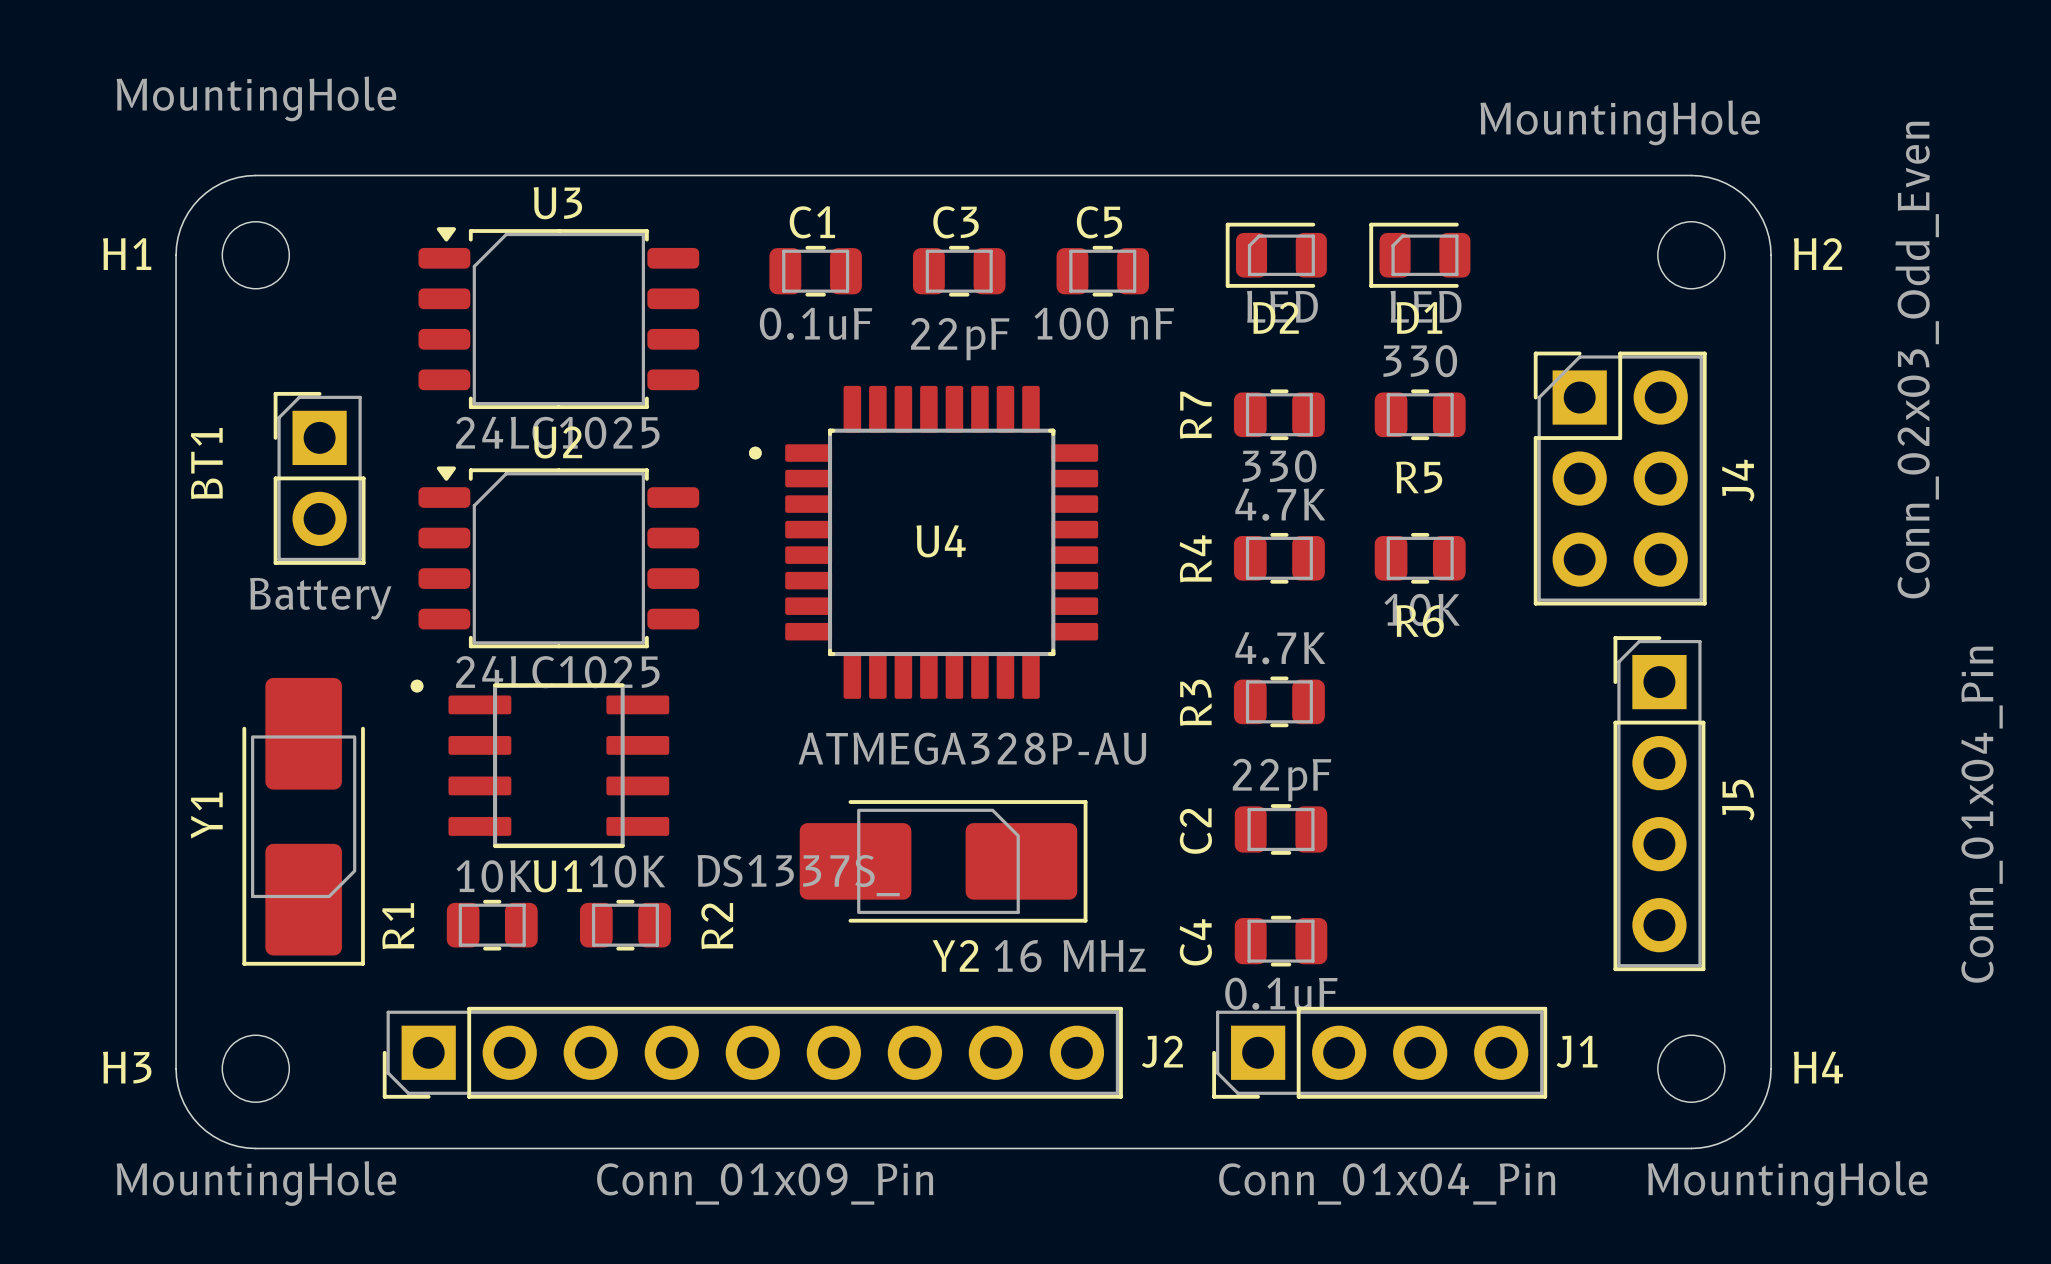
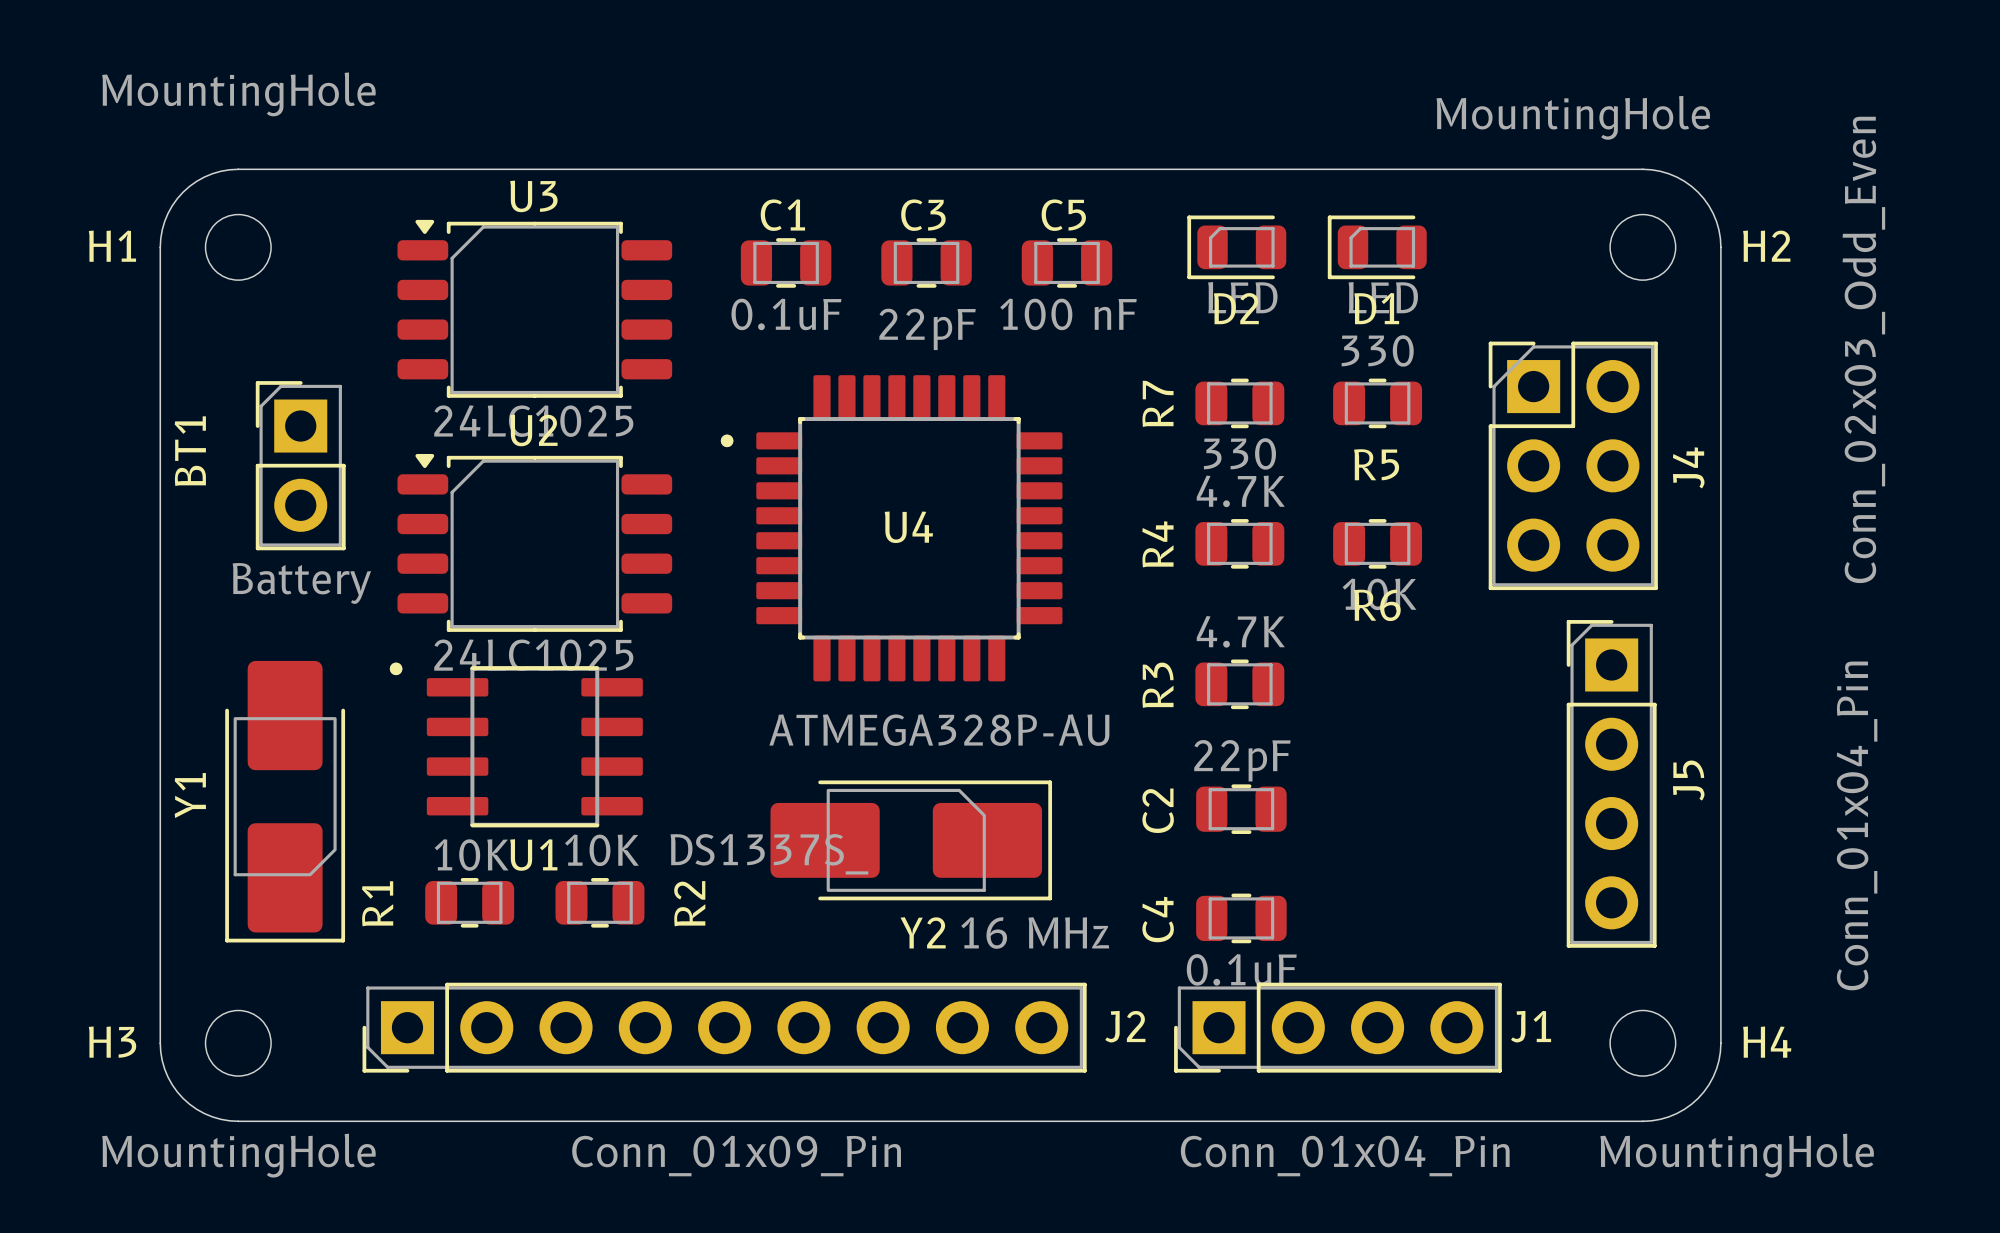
J5 value position: Conn_01x04_Pin (1982, 814) -> Conn_01x04_Pin (1857, 825)

